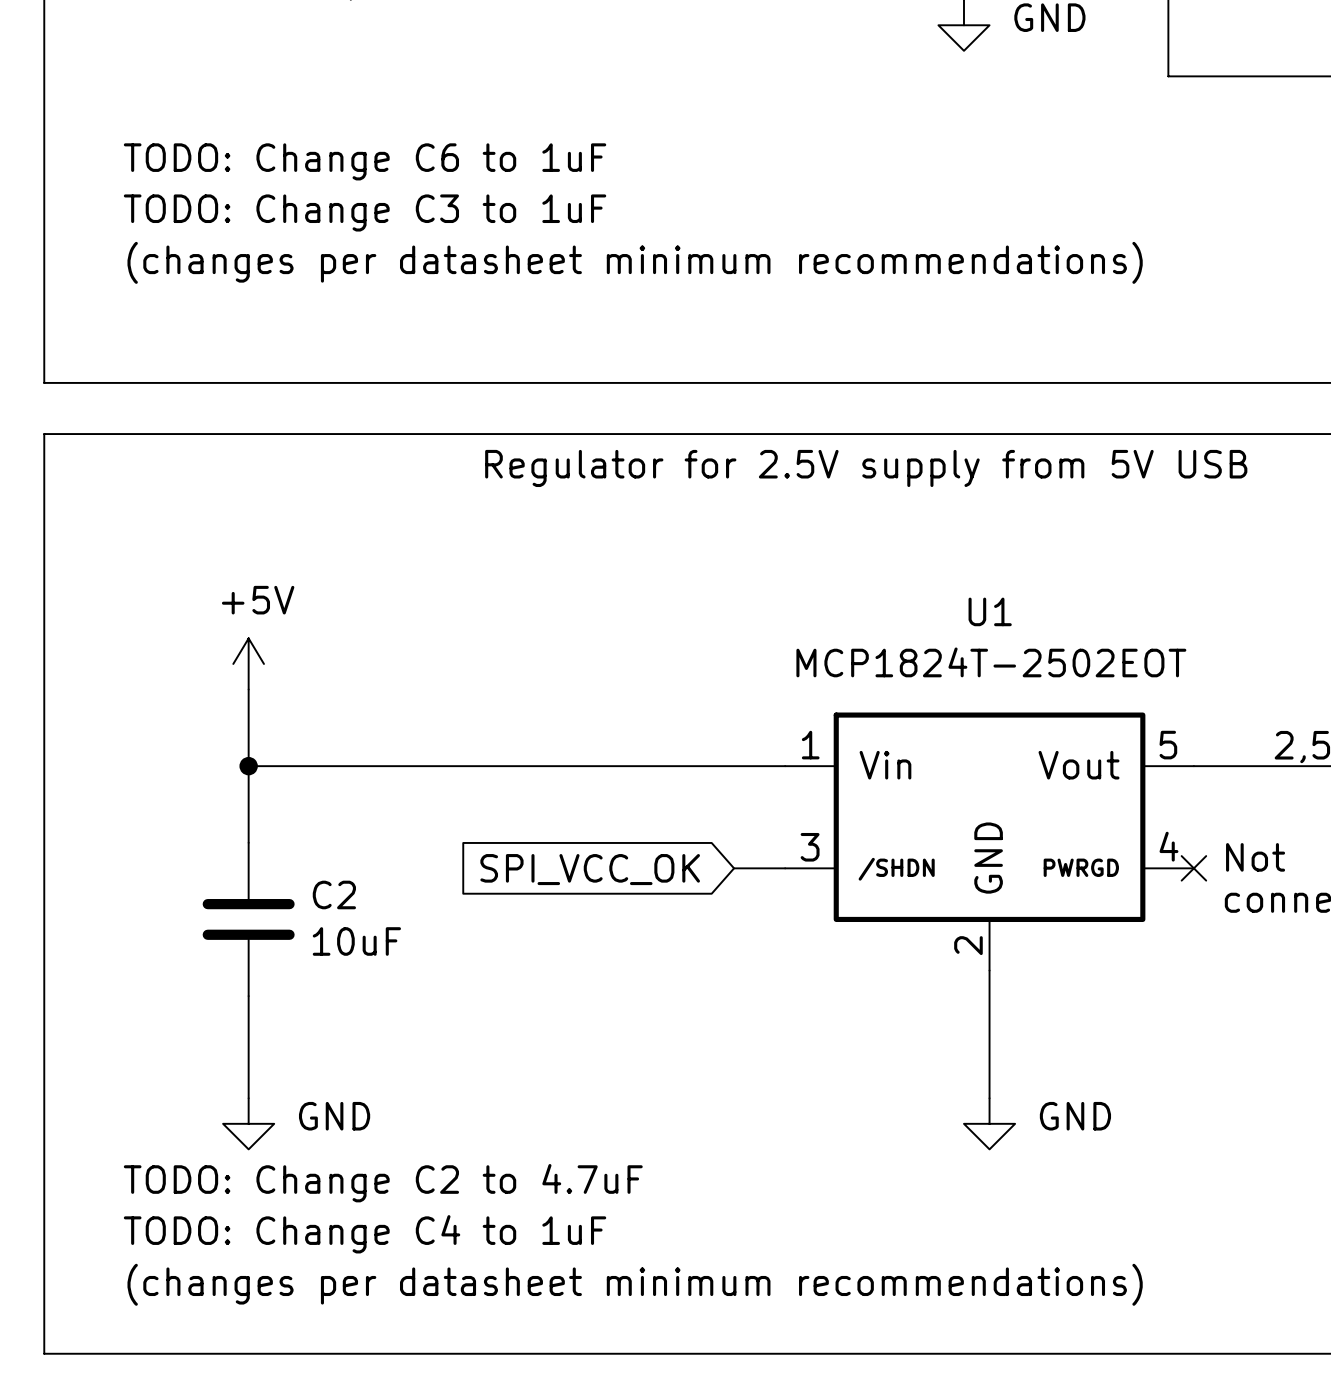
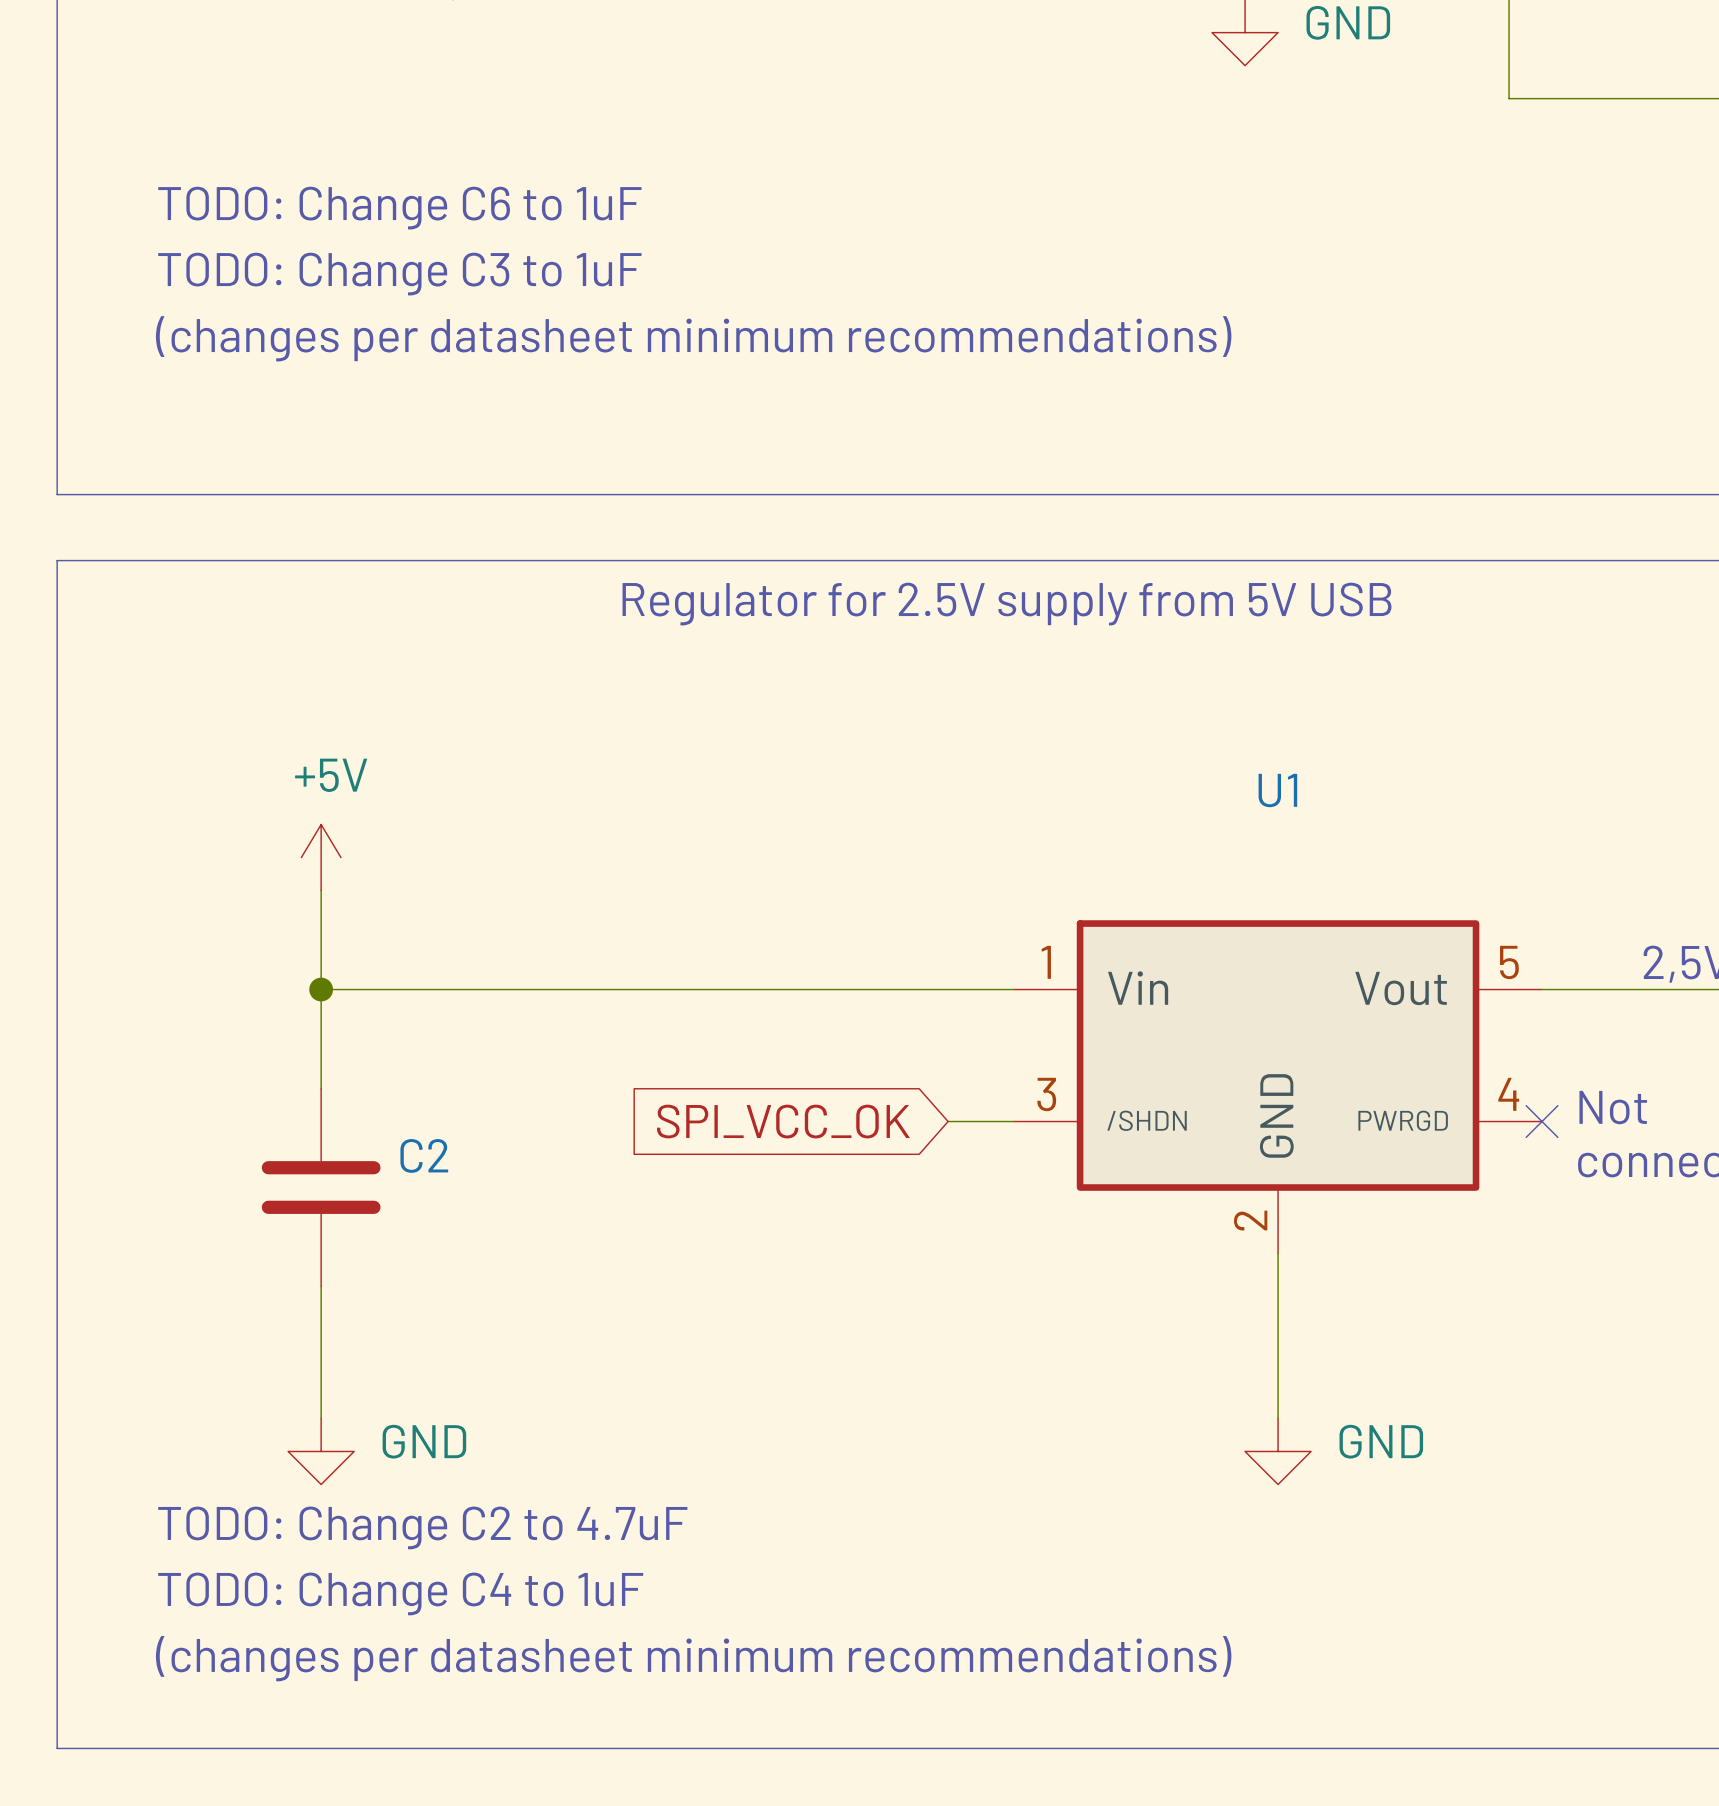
U1 value: MCP1824T-2502EOT (991, 662) -> none
C2 value: 10uF (356, 941) -> none

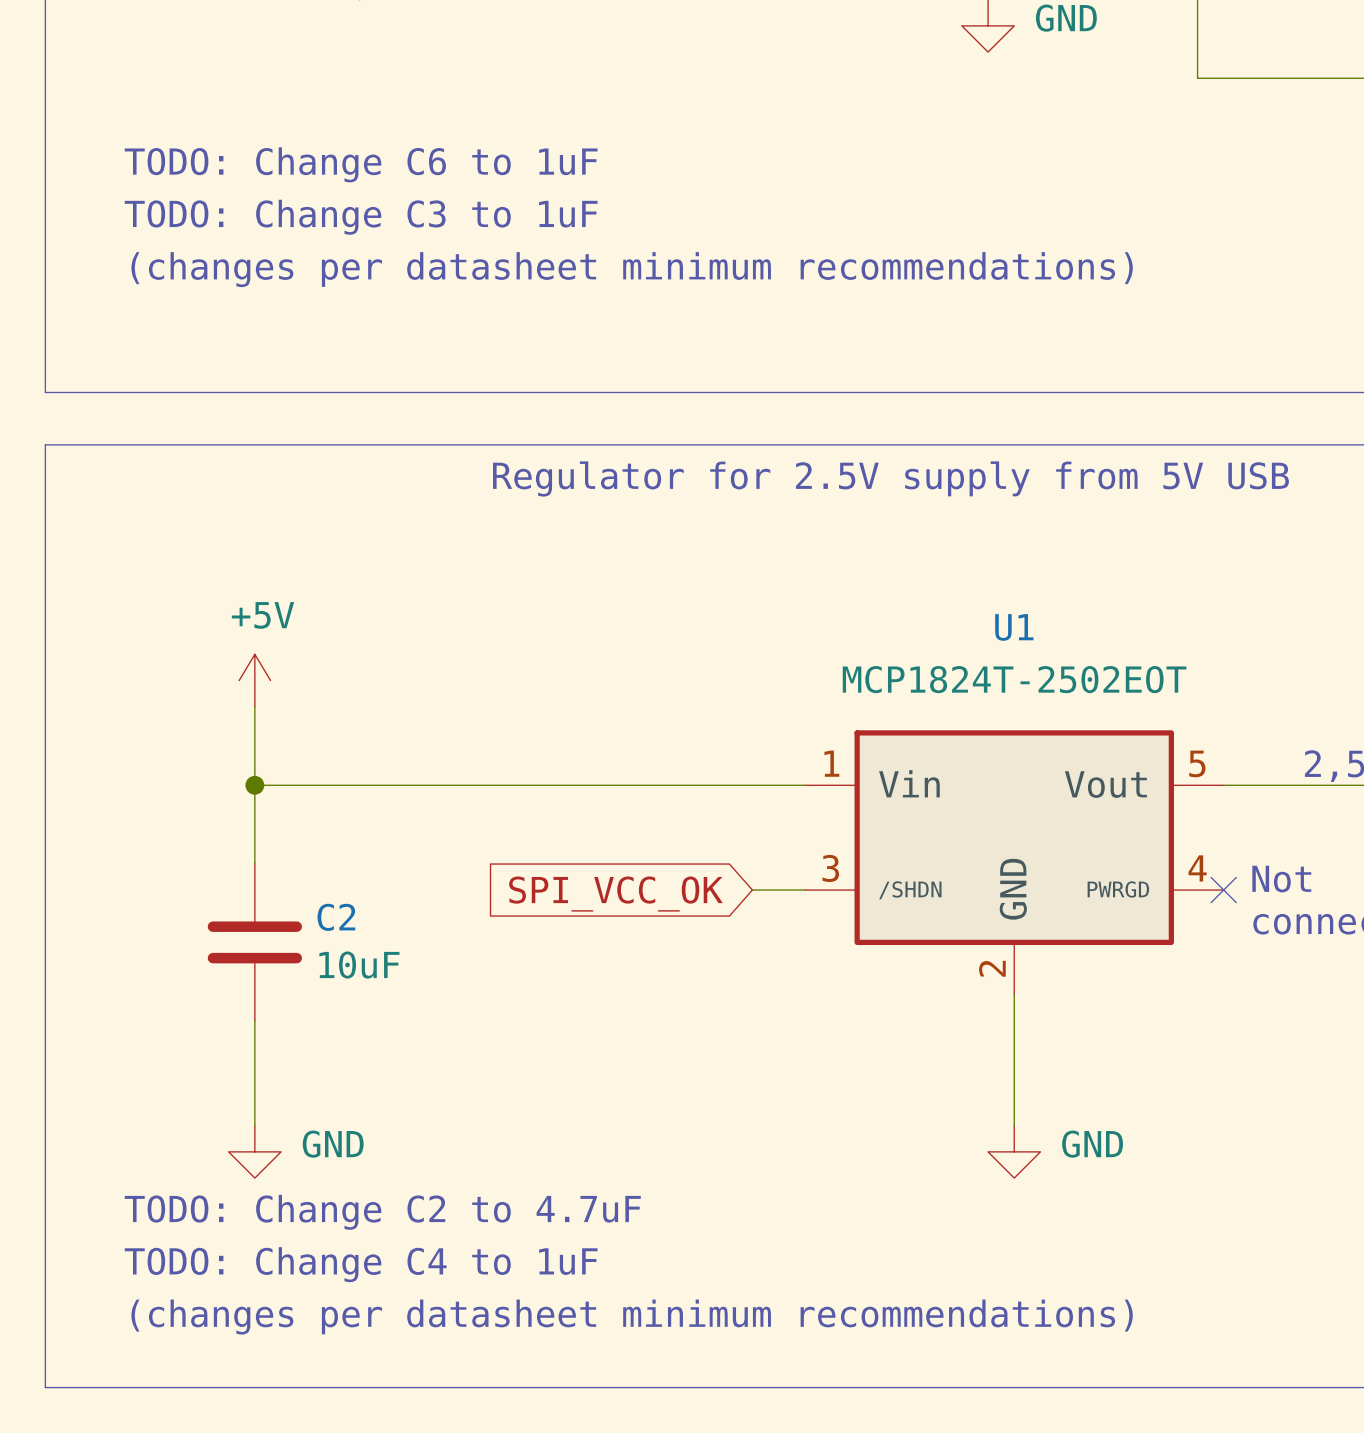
U1 value: none -> MCP1824T-2502EOT (1014, 679)
C2 value: none -> 10uF (359, 965)

